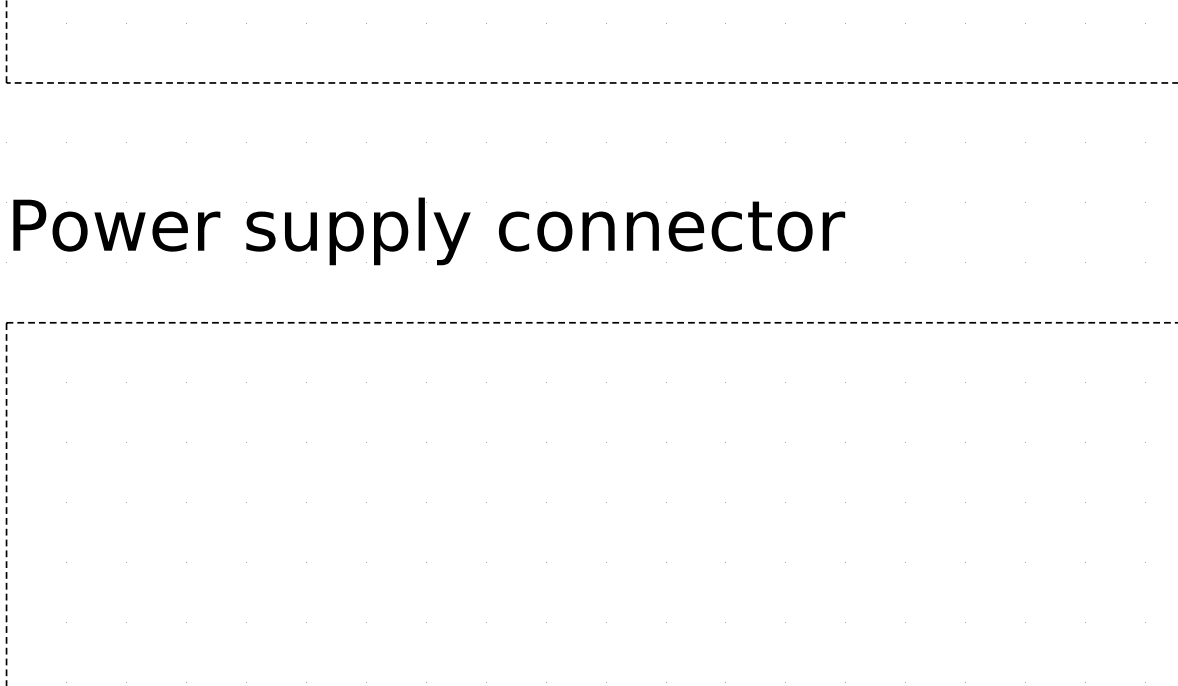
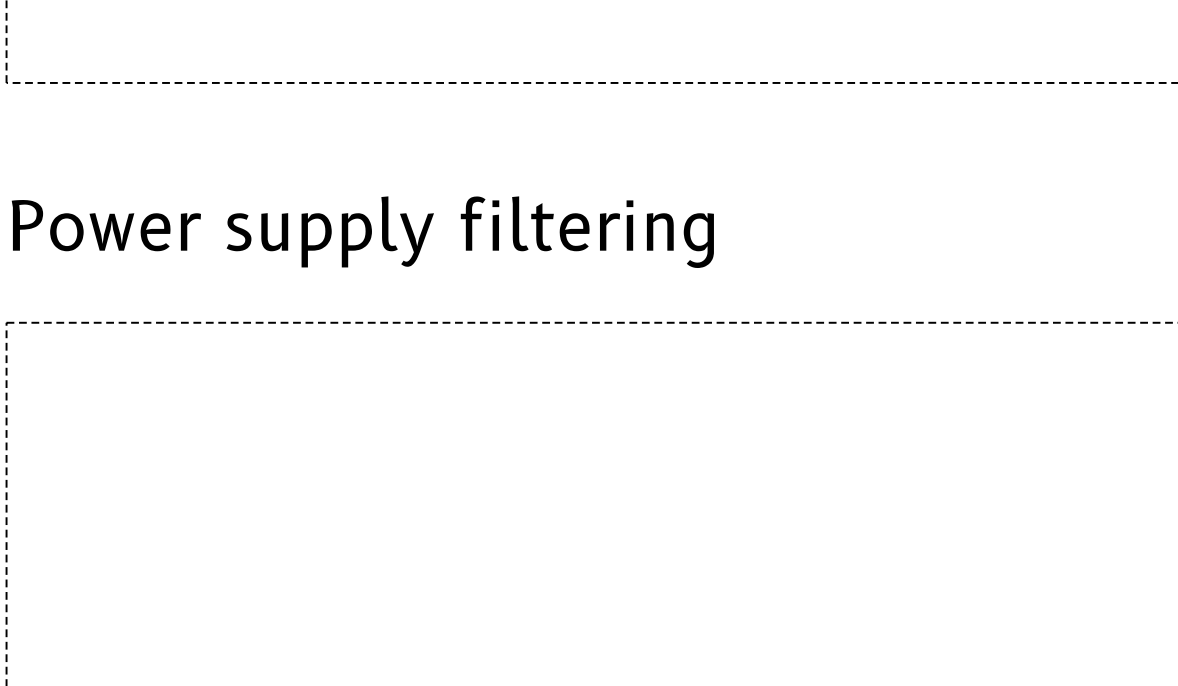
text: Power supply connector (429, 231) -> Power supply filtering (362, 232)

